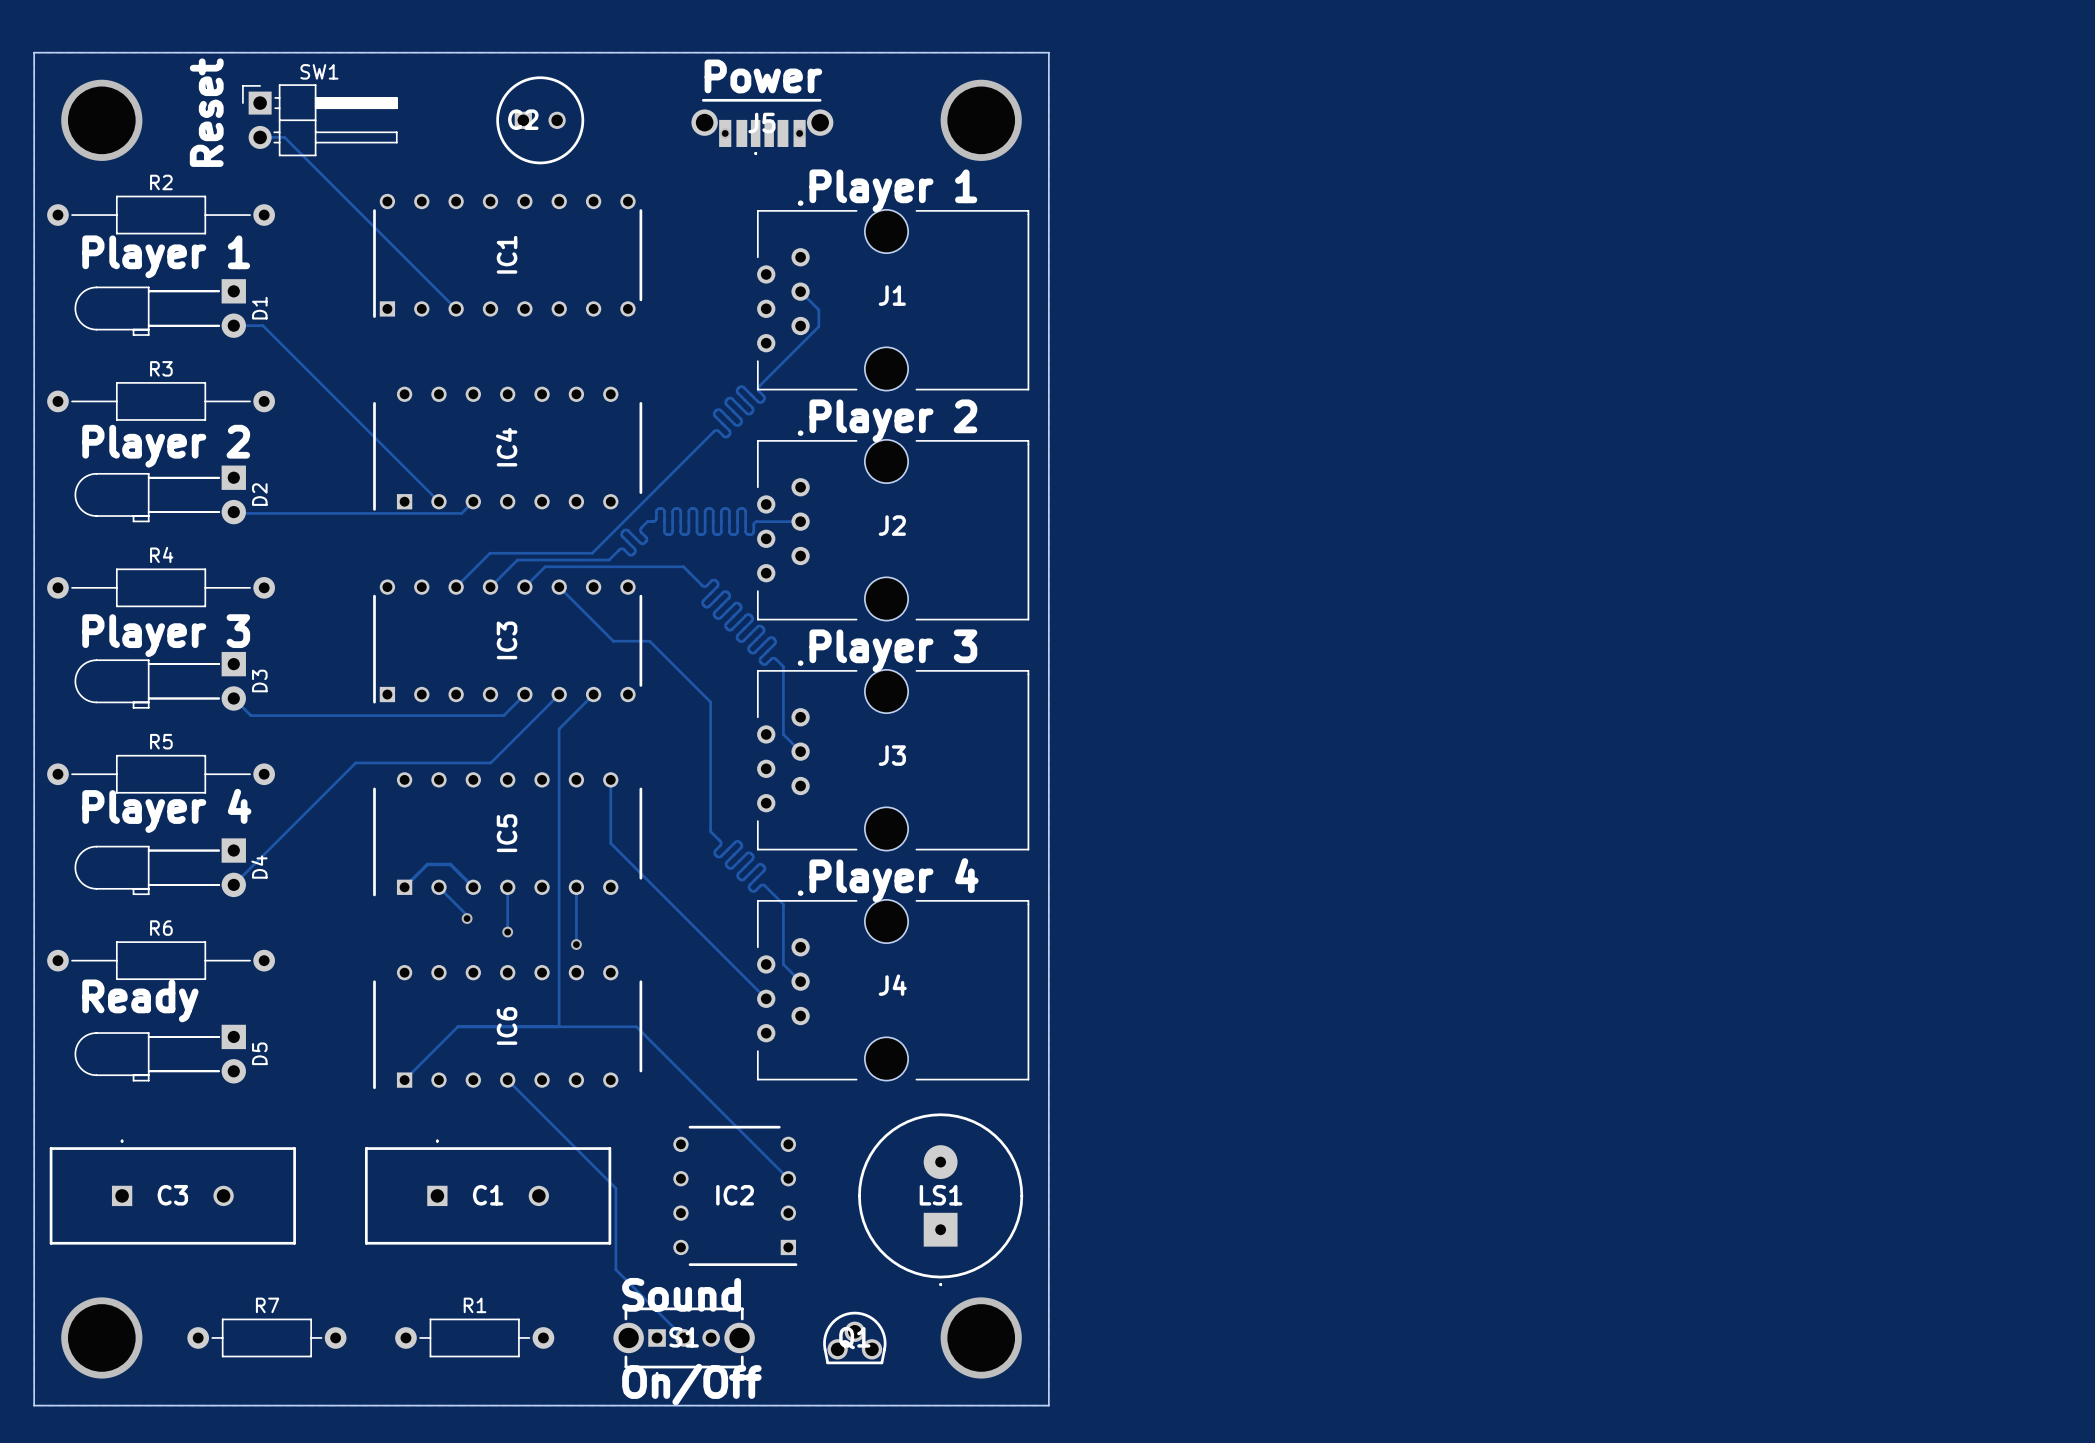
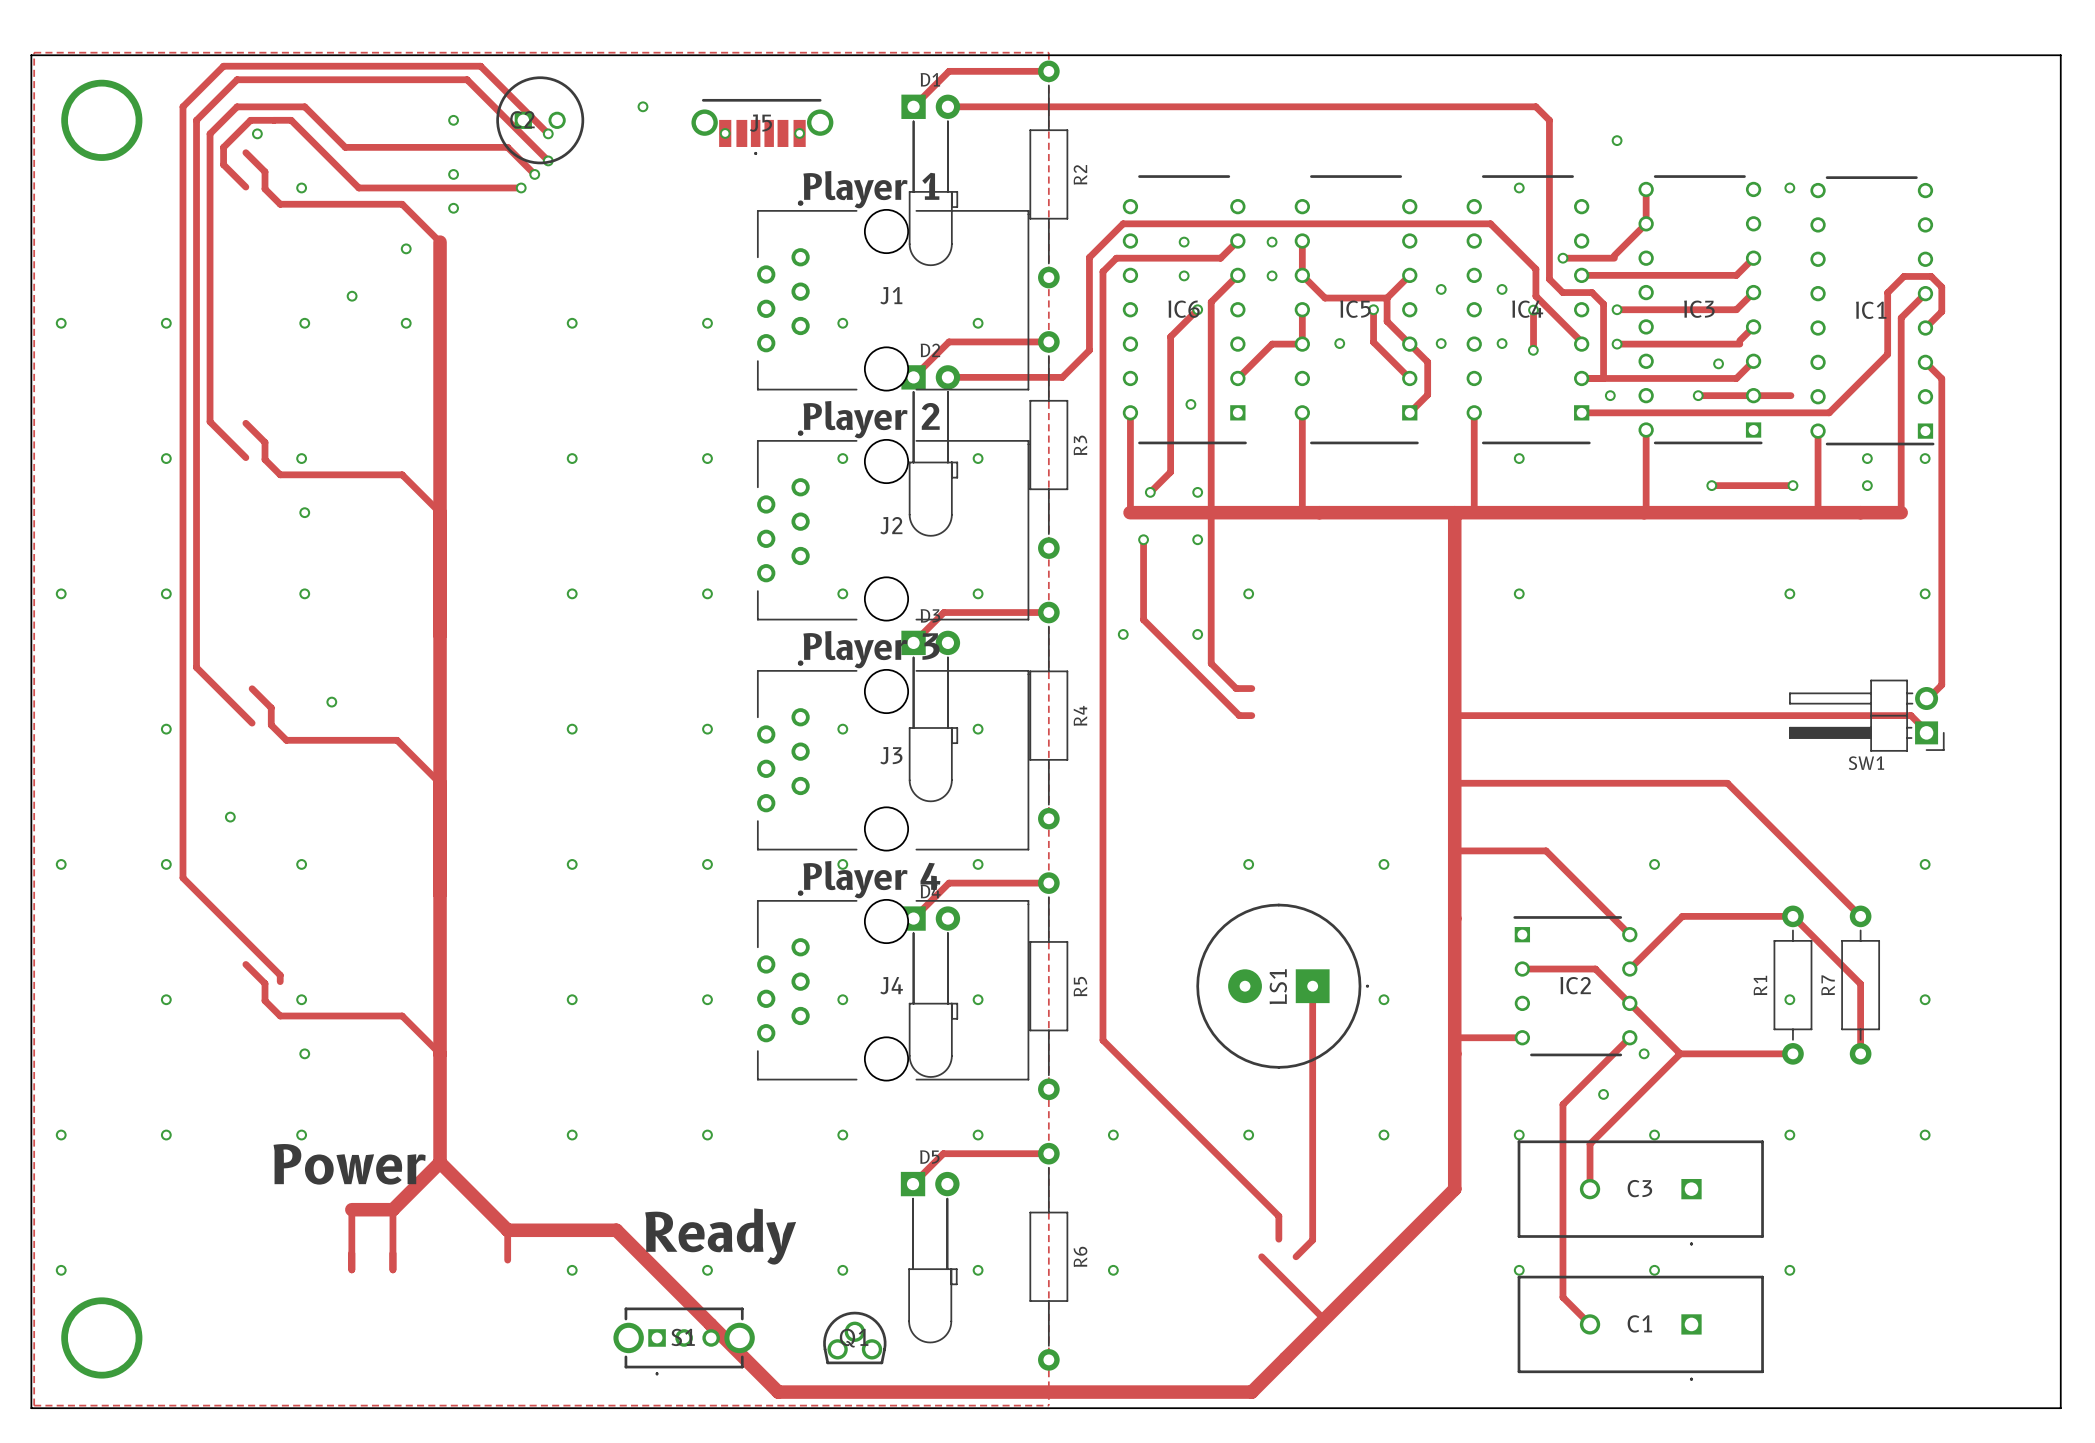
board edge: (34, 52) (1048, 52) (1048, 1405) (34, 1405) (34, 52) -> none
board edge: none -> (31, 55) (2060, 55) (2060, 1408) (31, 1408) (31, 55)
track: none -> (1048, 71) (949, 71) (913, 106)
text: Power (763, 76) -> none
via: none -> (642, 106)
track: none -> (947, 106) (1535, 106) (1549, 120) (1549, 279) (1562, 292) (1591, 292) (1603, 304) (1603, 378)
text: Reset (206, 112) -> none
SW1 rotation: 0° (319, 120) -> 180° (1866, 715)
SW1 position: (319, 120) -> (1866, 715)
via: none -> (453, 120)
via: (981, 120) -> none
via: none -> (257, 133)
track: none -> (548, 133) (480, 66) (223, 66) (182, 106) (182, 877) (280, 975) (280, 981)
via: none -> (548, 133)
track: (260, 137) (284, 137) (456, 308) -> none
via: none -> (1617, 140)
track: none -> (245, 152) (265, 171) (265, 189) (280, 204) (402, 204) (440, 242) (440, 1162)
track: none -> (548, 160) (467, 79) (237, 79) (196, 120) (196, 667) (252, 723)
via: none -> (548, 160)
via: none -> (453, 174)
track: none -> (534, 174) (507, 147) (345, 147) (304, 106) (237, 106) (210, 133) (210, 421) (245, 457)
via: none -> (534, 174)
track: none -> (245, 187) (223, 164) (223, 147) (250, 120) (291, 120) (358, 187) (521, 187)
via: none -> (301, 187)
via: none -> (521, 187)
via: none -> (1519, 187)
via: none -> (1789, 187)
track: none -> (1646, 189) (1646, 223) (1614, 255)
via: none -> (453, 208)
R2 rotation: 0° (161, 215) -> 90° clockwise (1048, 174)
R2 position: (161, 215) -> (1048, 174)
track: none -> (1237, 241) (1220, 258) (1116, 258) (1102, 271) (1102, 1040) (1278, 1216) (1278, 1239)
track: none -> (1302, 241) (1302, 275) (1325, 298) (1387, 298)
via: none -> (1184, 242)
via: none -> (1272, 242)
via: none -> (406, 248)
IC1 rotation: 0° (507, 255) -> 90° counterclockwise (1872, 310)
IC1 position: (507, 255) -> (1872, 310)
text: Player 1 (166, 256) -> none
track: none -> (1562, 258) (1614, 258)
via: none -> (1562, 258)
track: none -> (1753, 258) (1736, 275) (1581, 275)
via: none -> (1184, 275)
track: none -> (1237, 275) (1211, 302) (1211, 663) (1236, 688) (1251, 688)
via: none -> (1272, 275)
track: none -> (1409, 275) (1387, 298)
via: none -> (1441, 289)
via: none -> (1502, 289)
track: (800, 291) (818, 309) (818, 326) (758, 386) (758, 389) (764, 396) (764, 400) (758, 402) (743, 387) (739, 387) (737, 392) (752, 407) (752, 411) (747, 413) (732, 398) (728, 398) (725, 403) (741, 419) (741, 423) (735, 425) (720, 410) (716, 410) (714, 415) (729, 430) (729, 434) (724, 436) (718, 430) (714, 431) (592, 553) (489, 553) (456, 587) -> none
track: none -> (1753, 292) (1736, 309) (1617, 309)
track: none -> (1925, 293) (1901, 317) (1901, 512) (1130, 512) (1130, 412)
via: none -> (352, 296)
track: none -> (1387, 298) (1387, 321) (1427, 362) (1427, 394) (1409, 412)
D1 rotation: 0° (160, 308) -> 90° counterclockwise (930, 180)
D1 position: (160, 308) -> (930, 180)
track: none -> (1197, 309) (1170, 336) (1170, 472) (1150, 492)
via: none -> (1197, 309)
track: none -> (1302, 309) (1302, 344) (1272, 344) (1237, 378)
track: none -> (1373, 309) (1373, 342) (1409, 378)
via: none -> (1373, 309)
via: none -> (1617, 309)
track: none -> (1533, 310) (1533, 350)
via: none -> (1533, 310)
via: none -> (61, 323)
via: none -> (166, 323)
via: none -> (304, 323)
via: none -> (406, 323)
via: none -> (572, 323)
via: none -> (707, 323)
via: none -> (842, 323)
via: none -> (978, 323)
track: (233, 325) (262, 325) (438, 501) -> none
track: none -> (1753, 326) (1739, 340)
track: none -> (1925, 328) (1941, 311) (1941, 287) (1931, 276) (1903, 276) (1887, 292) (1887, 354) (1829, 412) (1581, 412)
track: none -> (1048, 341) (949, 341) (913, 377)
via: none -> (1339, 343)
via: none -> (1441, 343)
via: none -> (1502, 343)
track: none -> (1581, 344) (1535, 296) (1535, 269) (1490, 223) (1123, 223) (1089, 257) (1089, 350) (1062, 377) (947, 377)
track: none -> (1617, 344) (1739, 344)
via: none -> (1617, 344)
via: none -> (1533, 350)
track: none -> (1753, 361) (1736, 378) (1581, 378)
track: none -> (1925, 362) (1941, 378) (1941, 684) (1928, 698)
via: none -> (1718, 363)
via: none -> (1610, 395)
track: none -> (1698, 395) (1790, 395)
via: none -> (1698, 395)
R3 rotation: 0° (161, 401) -> 90° clockwise (1048, 445)
R3 position: (161, 401) -> (1048, 445)
via: none -> (1190, 404)
track: none -> (1302, 412) (1302, 509) (1305, 512) (1319, 512)
track: none -> (1474, 412) (1474, 512) (1454, 512) (1454, 1189) (1251, 1392) (778, 1392) (616, 1230) (507, 1230)
track: none -> (245, 423) (265, 442) (265, 459) (280, 474) (402, 474) (440, 512)
track: none -> (1646, 430) (1646, 510) (1644, 512)
track: none -> (1818, 431) (1818, 510) (1820, 512) (1860, 512)
text: Player 2 (166, 446) -> none
IC4 rotation: 0° (507, 448) -> 90° counterclockwise (1528, 309)
IC4 position: (507, 448) -> (1528, 309)
via: none -> (166, 458)
via: none -> (301, 458)
via: none -> (572, 458)
via: none -> (707, 458)
via: none -> (842, 458)
via: none -> (978, 458)
via: none -> (1519, 458)
via: none -> (1867, 458)
via: none -> (1925, 458)
track: none -> (1711, 485) (1792, 485)
via: none -> (1711, 485)
via: none -> (1792, 485)
via: none -> (1867, 485)
via: none -> (1150, 492)
via: none -> (1197, 492)
D2 rotation: 0° (160, 494) -> 90° counterclockwise (930, 450)
D2 position: (160, 494) -> (930, 450)
track: (473, 501) (461, 513) (229, 513) -> none
via: none -> (304, 512)
track: (805, 526) (800, 521) (756, 521) (753, 523) (753, 533) (748, 534) (745, 531) (745, 510) (740, 508) (737, 511) (737, 532) (731, 534) (729, 531) (729, 510) (724, 508) (721, 511) (721, 532) (715, 534) (713, 531) (713, 510) (707, 508) (705, 511) (704, 532) (699, 534) (696, 531) (696, 510) (691, 508) (688, 511) (688, 532) (683, 534) (680, 531) (680, 510) (675, 508) (672, 511) (672, 532) (667, 534) (664, 531) (664, 510) (658, 508) (656, 510) (655, 520) (647, 521) (640, 528) (640, 531) (646, 538) (644, 543) (640, 543) (627, 530) (622, 532) (622, 536) (635, 549) (632, 555) (621, 548) (609, 560) (517, 560) (490, 587) -> none
track: none -> (1143, 539) (1143, 619) (1239, 715) (1251, 715)
via: none -> (1143, 539)
via: none -> (1197, 539)
R4 rotation: 0° (161, 587) -> 90° clockwise (1048, 715)
R4 position: (161, 587) -> (1048, 715)
track: (524, 587) (545, 566) (683, 566) (703, 586) (715, 580) (717, 585) (703, 600) (703, 605) (708, 606) (723, 592) (726, 591) (729, 597) (714, 612) (714, 616) (720, 618) (734, 603) (737, 603) (740, 608) (726, 623) (726, 628) (731, 629) (748, 614) (752, 619) (737, 635) (739, 640) (743, 640) (758, 626) (764, 629) (748, 647) (750, 652) (754, 652) (769, 637) (775, 640) (774, 643) (760, 660) (765, 664) (774, 658) (783, 666) (783, 734) (800, 751) -> none
track: (559, 587) (613, 641) (649, 641) (710, 702) (710, 831) (721, 843) (714, 853) (720, 856) (735, 842) (739, 842) (741, 847) (726, 864) (731, 868) (747, 853) (752, 854) (752, 859) (737, 874) (741, 879) (758, 864) (764, 866) (764, 870) (749, 887) (754, 891) (760, 885) (764, 885) (783, 904) (783, 964) (800, 981) -> none
via: none -> (61, 593)
via: none -> (166, 593)
via: none -> (304, 593)
via: none -> (572, 593)
via: none -> (707, 593)
via: none -> (842, 593)
via: none -> (978, 593)
via: none -> (1248, 593)
via: none -> (1519, 593)
via: none -> (1789, 593)
via: none -> (1925, 593)
track: none -> (1048, 612) (943, 612) (913, 642)
via: none -> (1123, 634)
via: none -> (1197, 634)
text: Player 3 (166, 635) -> none
IC3 rotation: 0° (507, 641) -> 90° counterclockwise (1700, 309)
IC3 position: (507, 641) -> (1700, 309)
D3 rotation: 0° (160, 681) -> 90° counterclockwise (930, 716)
D3 position: (160, 681) -> (930, 716)
track: none -> (252, 688) (271, 707) (271, 725) (286, 740) (397, 740) (440, 783)
track: (524, 694) (503, 715) (250, 715) (233, 698) -> none
track: (559, 694) (490, 762) (355, 762) (233, 884) -> none
track: (593, 694) (559, 729) (559, 1026) -> none
via: none -> (331, 702)
track: none -> (1454, 715) (1911, 715) (1928, 732)
via: none -> (166, 729)
via: none -> (572, 729)
via: none -> (707, 729)
via: none -> (842, 729)
via: none -> (978, 729)
R5 rotation: 0° (161, 774) -> 90° clockwise (1048, 986)
R5 position: (161, 774) -> (1048, 986)
track: (610, 779) (610, 843) (766, 998) -> none
track: none -> (1454, 783) (1727, 783) (1860, 916)
text: Player 4 (166, 810) -> none
via: none -> (230, 817)
IC5 rotation: 0° (507, 834) -> 90° counterclockwise (1356, 309)
IC5 position: (507, 834) -> (1356, 309)
track: none -> (1454, 850) (1546, 850) (1629, 934)
via: none -> (61, 864)
via: none -> (166, 864)
via: none -> (301, 864)
via: none -> (572, 864)
via: none -> (707, 864)
via: none -> (842, 864)
via: none -> (978, 864)
via: none -> (1248, 864)
via: none -> (1383, 864)
via: none -> (1654, 864)
via: none -> (1925, 864)
D4 rotation: 0° (160, 867) -> 90° counterclockwise (930, 992)
D4 position: (160, 867) -> (930, 992)
track: none -> (1048, 883) (949, 883) (913, 918)
track: (404, 887) (427, 864) (450, 864) (473, 887) -> none
track: (438, 887) (467, 915) (467, 918) -> none
track: (507, 887) (507, 932) -> none
track: (576, 887) (576, 944) -> none
via: (467, 918) -> none
via: (507, 932) -> none
via: (576, 944) -> none
R6 rotation: 0° (161, 960) -> 90° clockwise (1048, 1256)
R6 position: (161, 960) -> (1048, 1256)
track: none -> (245, 964) (265, 983) (265, 1000) (280, 1016) (402, 1016) (440, 1053)
track: none -> (1522, 969) (1595, 969) (1680, 1053)
track: none -> (1629, 969) (1682, 916) (1792, 916) (1860, 984) (1860, 1053)
track: none -> (1312, 986) (1312, 1240) (1296, 1256)
via: none -> (166, 999)
via: none -> (301, 999)
via: none -> (572, 999)
via: none -> (707, 999)
via: none -> (842, 999)
via: none -> (978, 999)
via: none -> (1383, 999)
via: none -> (1789, 999)
via: none -> (1925, 999)
text: Ready (140, 1000) -> none
IC6 rotation: 0° (507, 1027) -> 90° counterclockwise (1184, 309)
IC6 position: (507, 1027) -> (1184, 309)
track: none -> (1522, 1037) (1457, 1037) (1454, 1040) (1454, 1053)
track: none -> (1629, 1037) (1562, 1104) (1562, 1297) (1590, 1324)
via: none -> (304, 1053)
via: none -> (1644, 1053)
track: none -> (1680, 1053) (1590, 1144) (1590, 1189)
track: none -> (1680, 1053) (1792, 1053)
D5 rotation: 0° (160, 1054) -> 90° counterclockwise (930, 1257)
D5 position: (160, 1054) -> (930, 1257)
track: (404, 1080) (457, 1026) (636, 1026) (788, 1178) -> none
track: (507, 1080) (615, 1188) (615, 1269) (684, 1337) -> none
via: none -> (1603, 1094)
via: none -> (61, 1135)
via: none -> (166, 1135)
via: none -> (301, 1135)
via: none -> (572, 1135)
via: none -> (707, 1135)
via: none -> (842, 1135)
via: none -> (978, 1135)
via: none -> (1113, 1135)
via: none -> (1248, 1135)
via: none -> (1383, 1135)
via: none -> (1519, 1135)
via: none -> (1654, 1135)
via: none -> (1789, 1135)
via: none -> (1925, 1135)
track: none -> (1048, 1153) (943, 1153) (913, 1184)
track: none -> (440, 1162) (507, 1230)
track: none -> (440, 1162) (392, 1209)
text: none -> Power (349, 1164)
C3 rotation: 0° (172, 1192) -> 180° (1640, 1192)
C3 position: (172, 1192) -> (1640, 1192)
C1 rotation: 0° (488, 1192) -> 180° (1640, 1328)
C1 position: (488, 1192) -> (1640, 1328)
IC2 rotation: 0° (735, 1195) -> 180° (1575, 986)
IC2 position: (735, 1195) -> (1575, 986)
LS1 rotation: 0° (940, 1199) -> 90° counterclockwise (1282, 986)
LS1 position: (940, 1199) -> (1282, 986)
track: none -> (392, 1209) (392, 1269)
track: none -> (392, 1209) (351, 1209) (351, 1269)
track: none -> (507, 1230) (507, 1260)
text: none -> Ready (720, 1236)
track: none -> (1261, 1256) (1324, 1319) (1285, 1358)
via: none -> (61, 1270)
via: none -> (572, 1270)
via: none -> (707, 1270)
via: none -> (842, 1270)
via: none -> (978, 1270)
via: none -> (1113, 1270)
via: none -> (1519, 1270)
via: none -> (1654, 1270)
via: none -> (1789, 1270)
text: Sound (681, 1294) -> none
R7 name position: R7 (267, 1305) -> R7 (1828, 985)
R1 name position: R1 (475, 1305) -> R1 (1760, 985)
R7 rotation: 0° (266, 1337) -> 90° clockwise (1860, 985)
R7 position: (266, 1337) -> (1860, 985)
R1 rotation: 0° (474, 1337) -> 90° clockwise (1792, 985)
R1 position: (474, 1337) -> (1792, 985)
via: (981, 1337) -> none
text: On/Off (691, 1384) -> none

